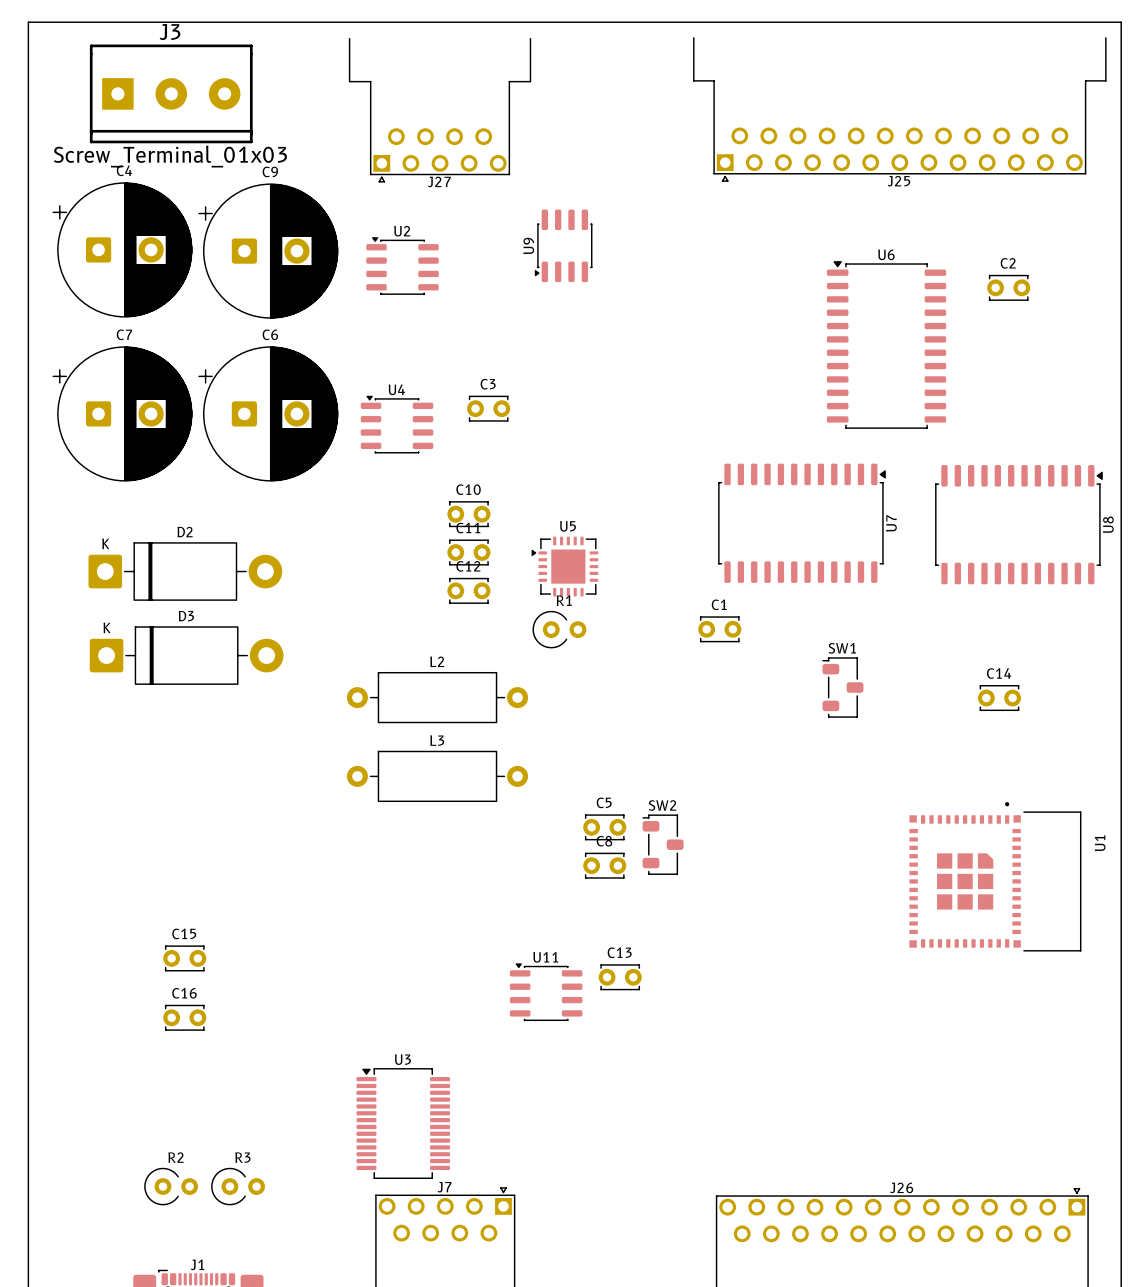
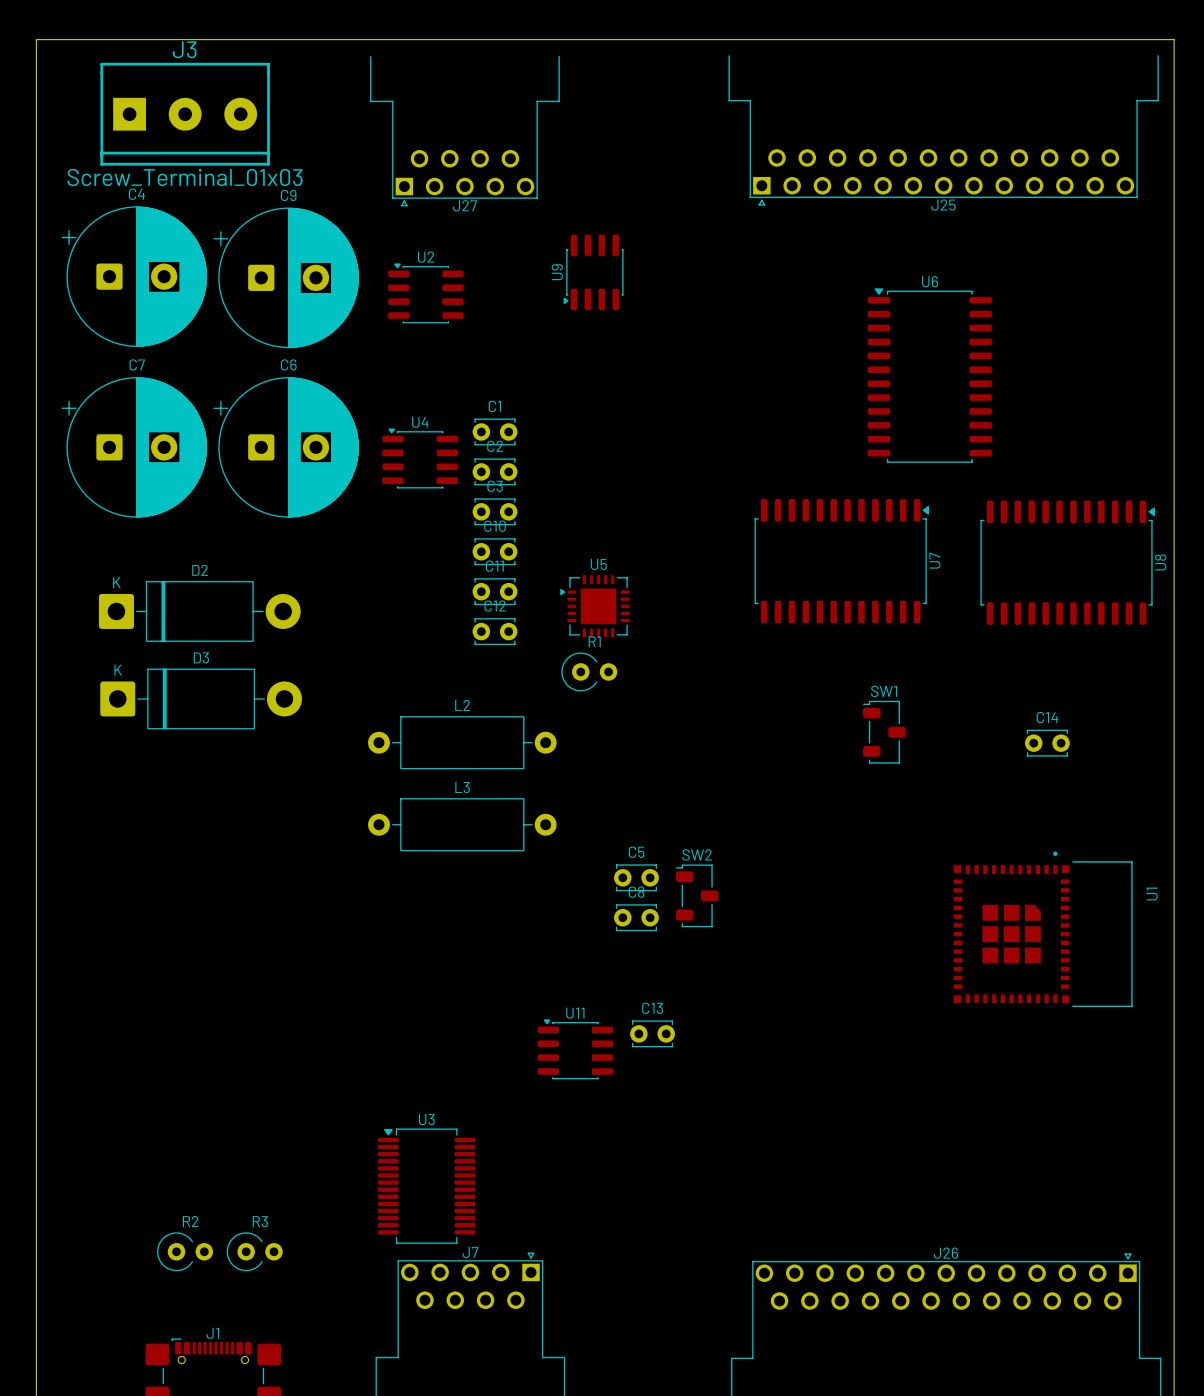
C2 position: (1008, 287) -> (495, 471)
C3 position: (488, 408) -> (495, 511)
C1 position: (719, 629) -> (495, 431)
C15: (184, 958) -> none
C16: (184, 1017) -> none

